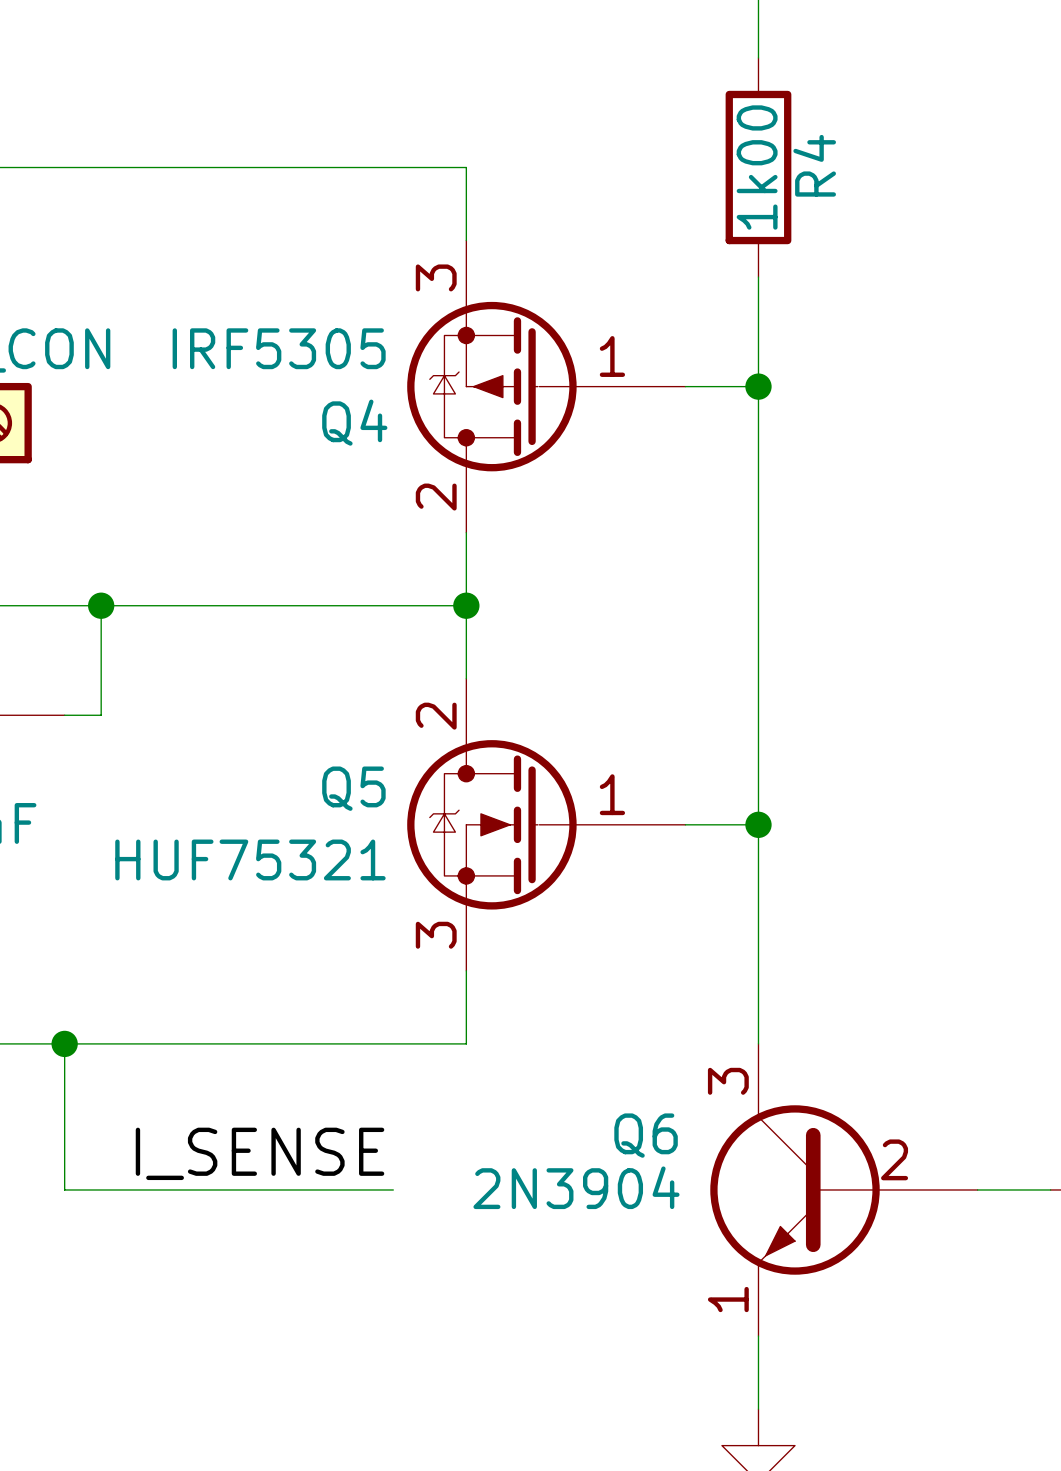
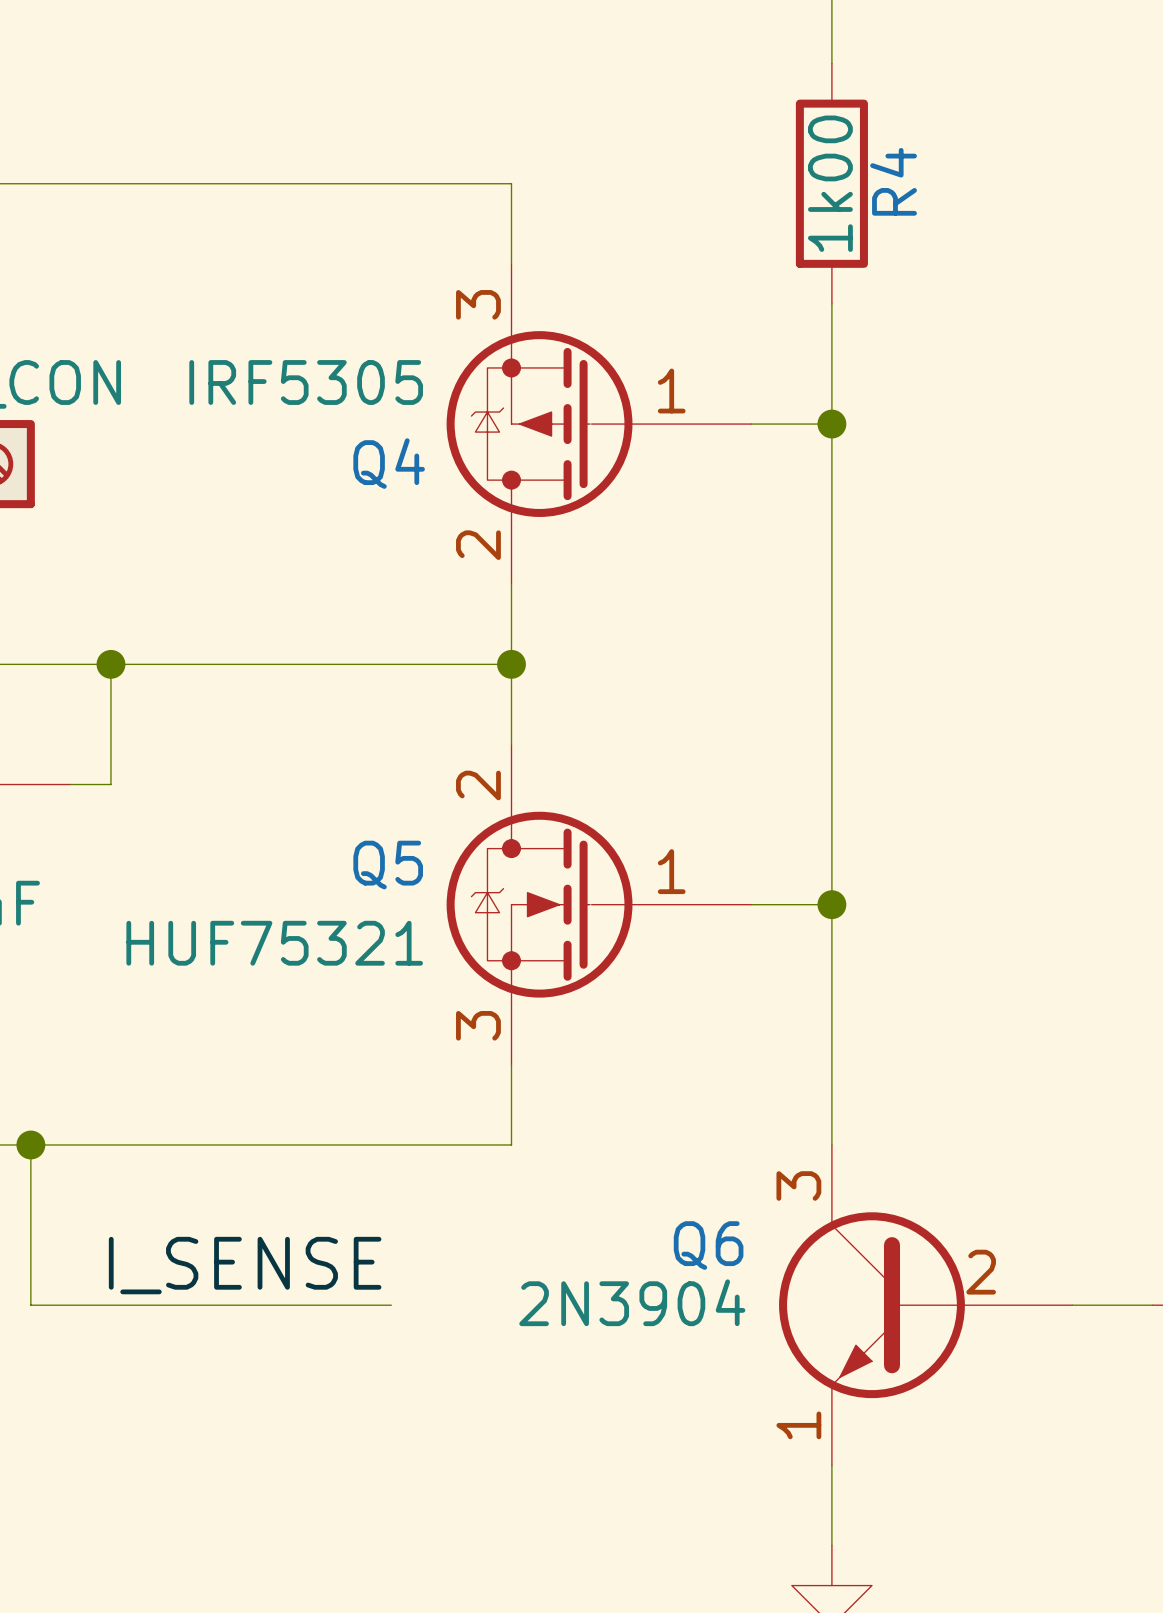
wire: (64, 1043) (64, 1189) -> (30, 1144) (30, 1305) (70, 1305)
junction position: (64, 1043) -> (30, 1144)
label position: I_SENSE (260, 1153) -> I_SENSE (245, 1265)
wire: (356, 1189) (393, 1189) -> none

